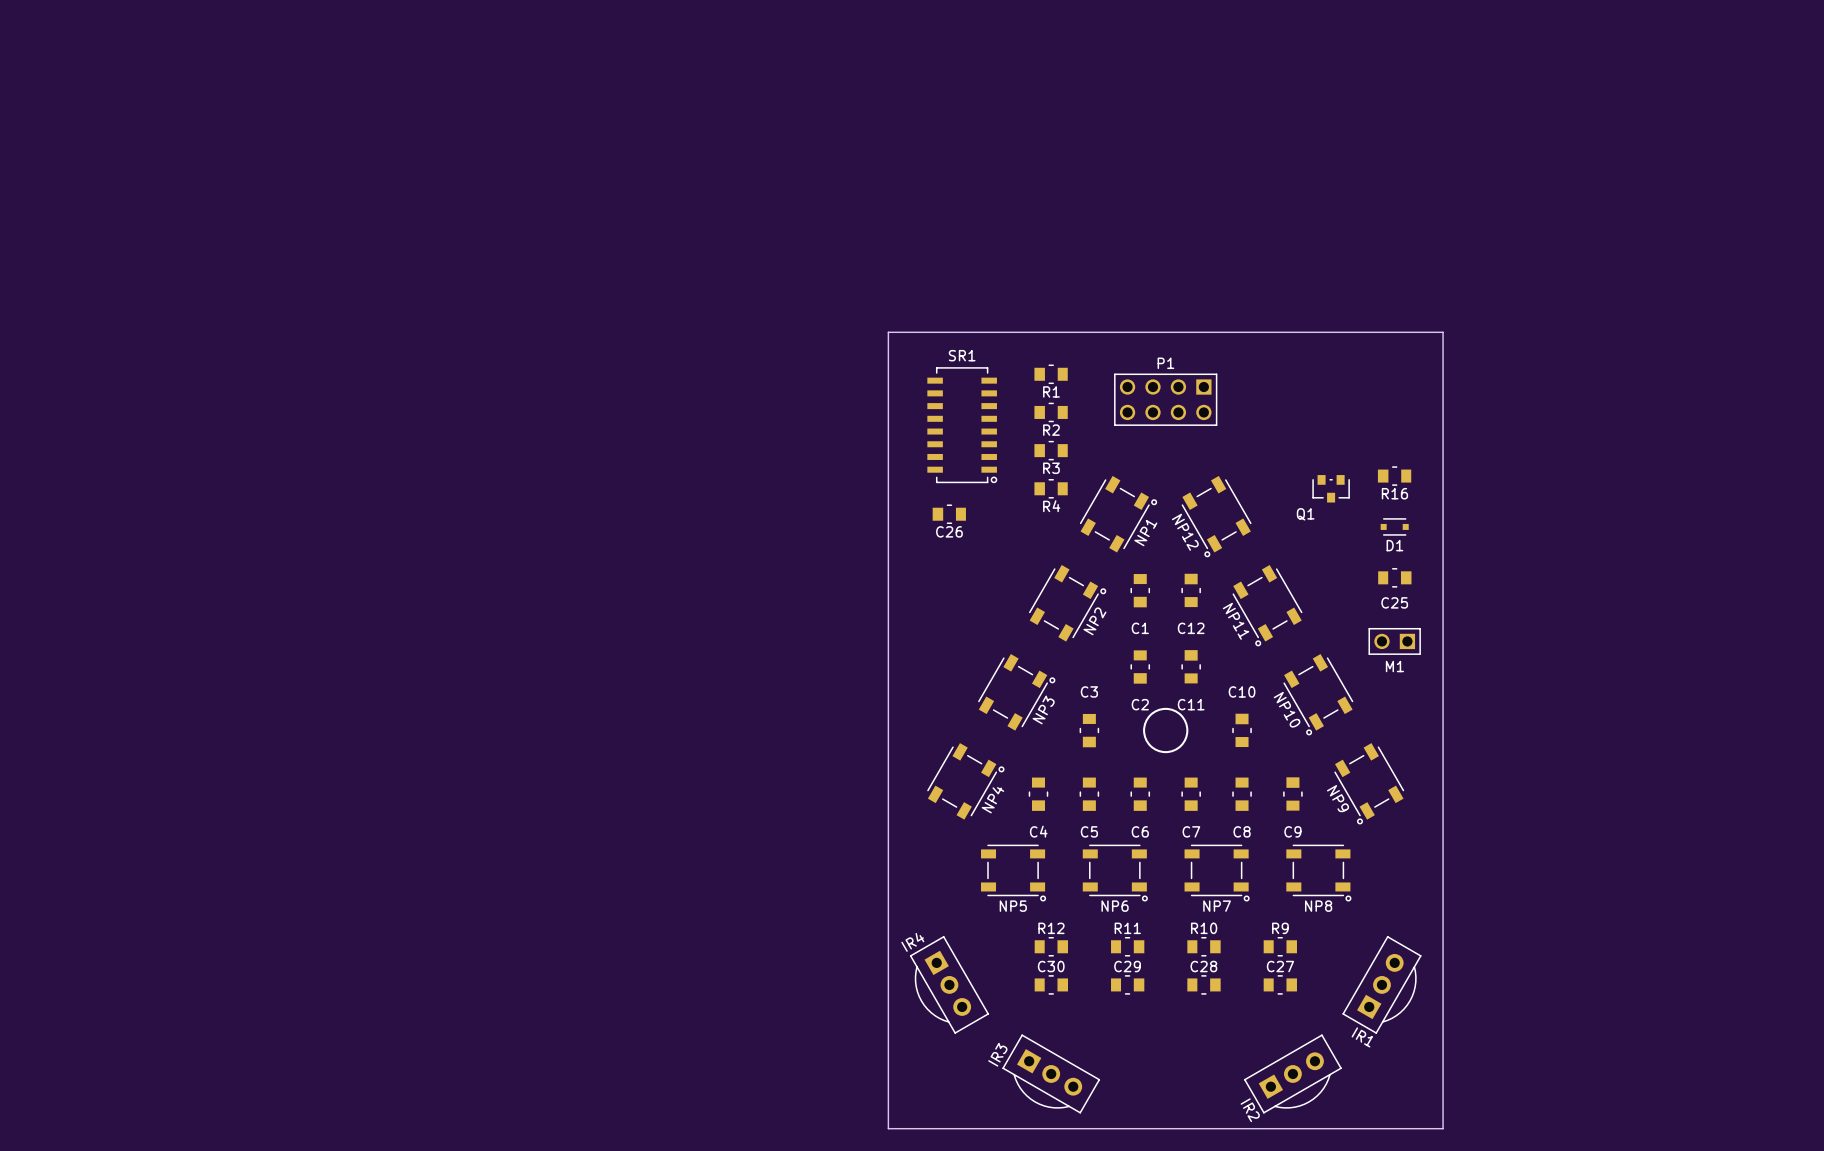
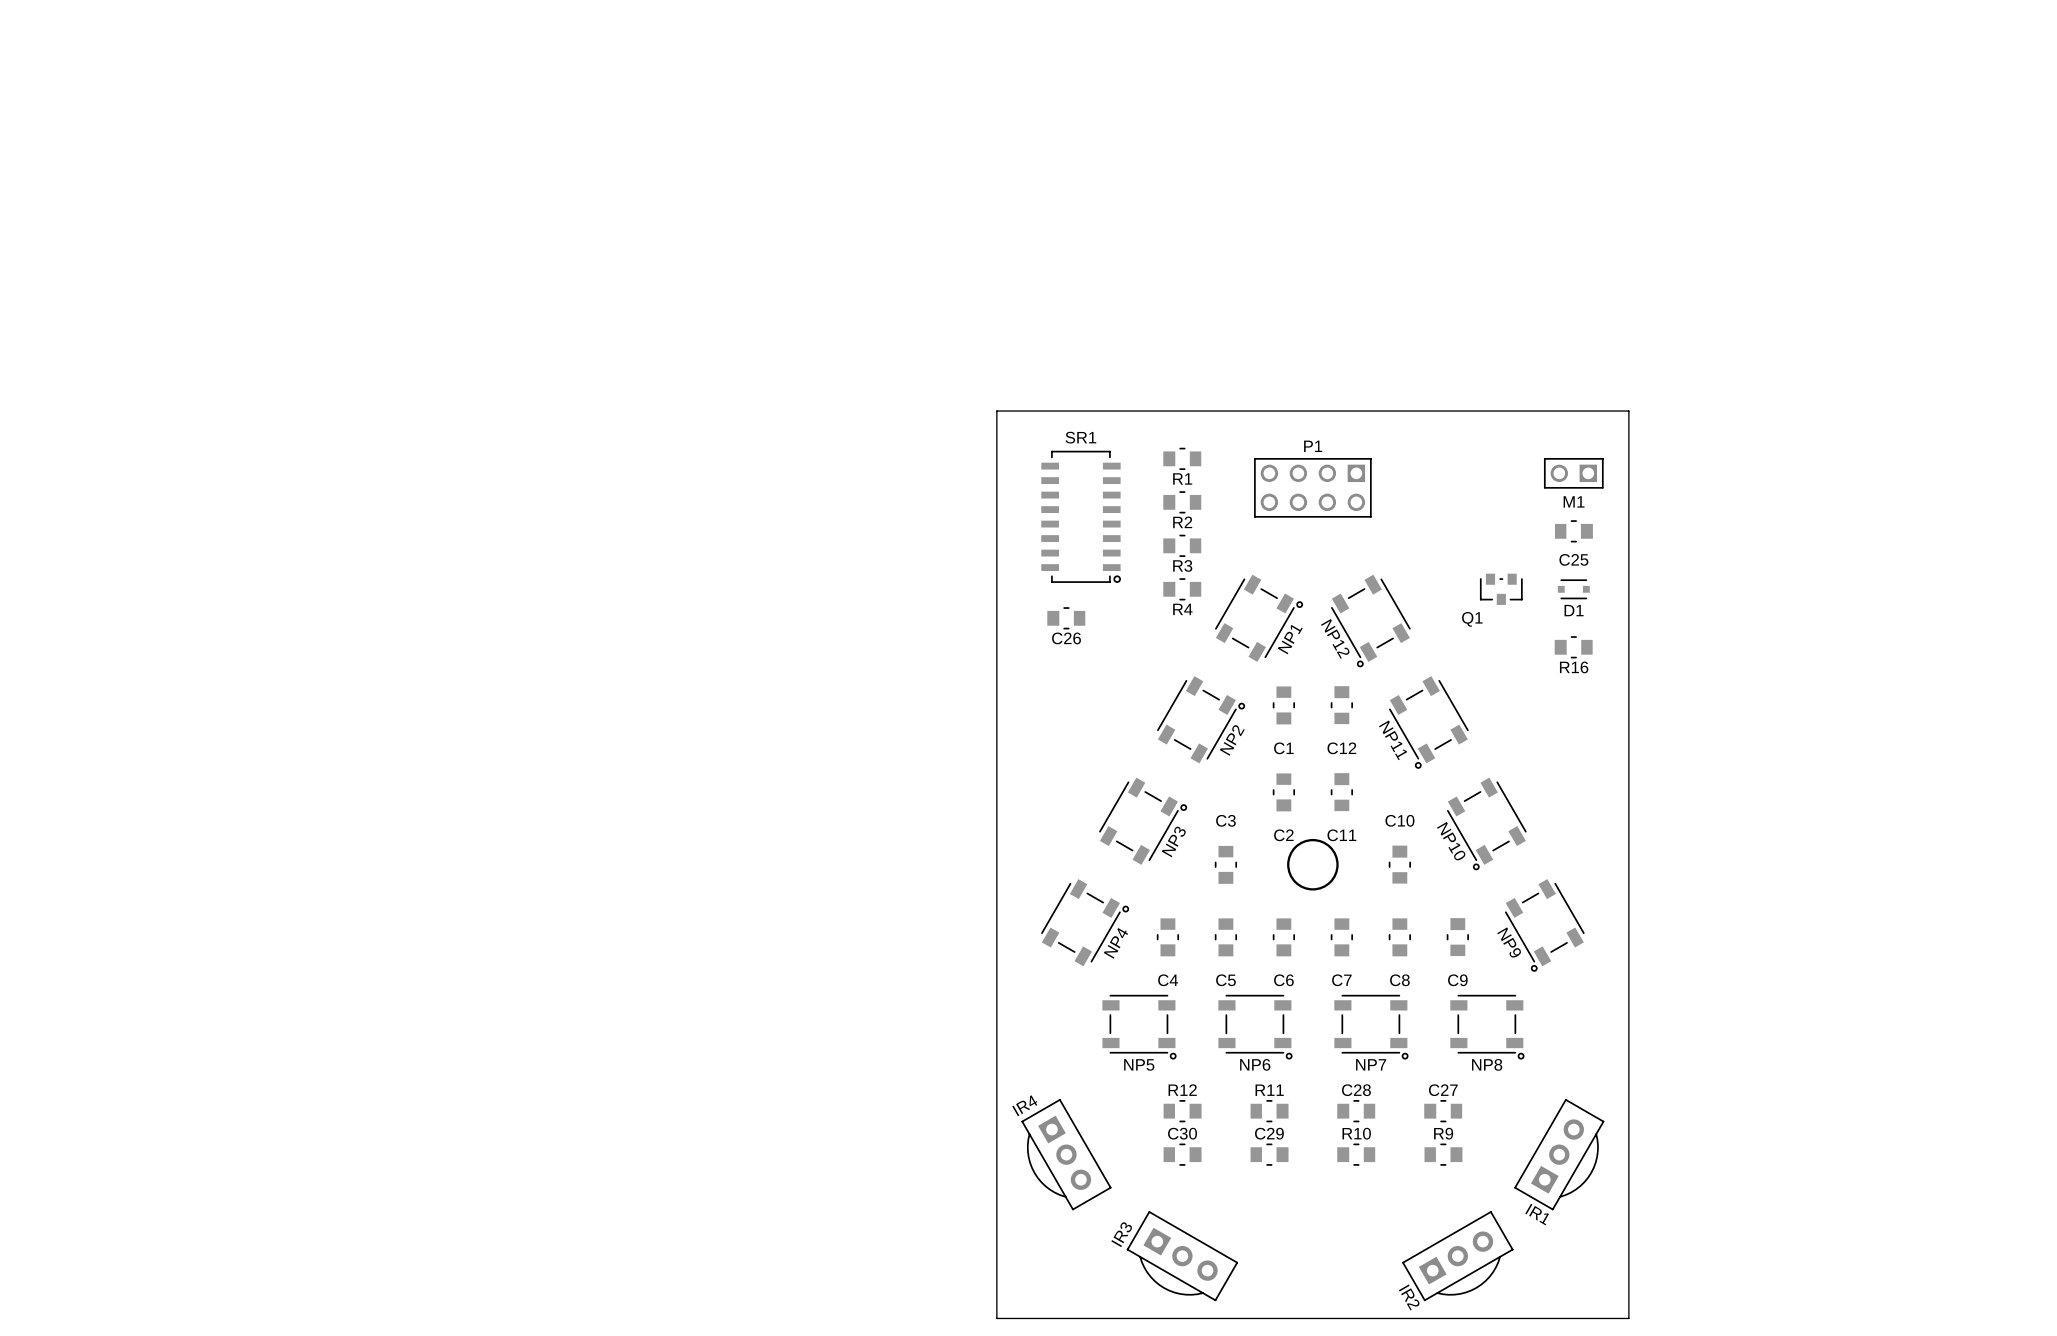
R16 position: (1394, 476) -> (1573, 647)
D1 position: (1394, 526) -> (1573, 589)
C25 position: (1394, 577) -> (1573, 531)
M1 position: (1394, 641) -> (1573, 473)
R10 rotation: 0° (1204, 946) -> 180° (1356, 1154)
R10 position: (1204, 946) -> (1356, 1154)
R9: (1280, 946) -> none
C27: none -> (1443, 1111)
C27 name: C27 (1280, 966) -> R9 (1443, 1133)
C28 rotation: 0° (1204, 984) -> 180° (1356, 1111)
C28 position: (1204, 984) -> (1356, 1111)

